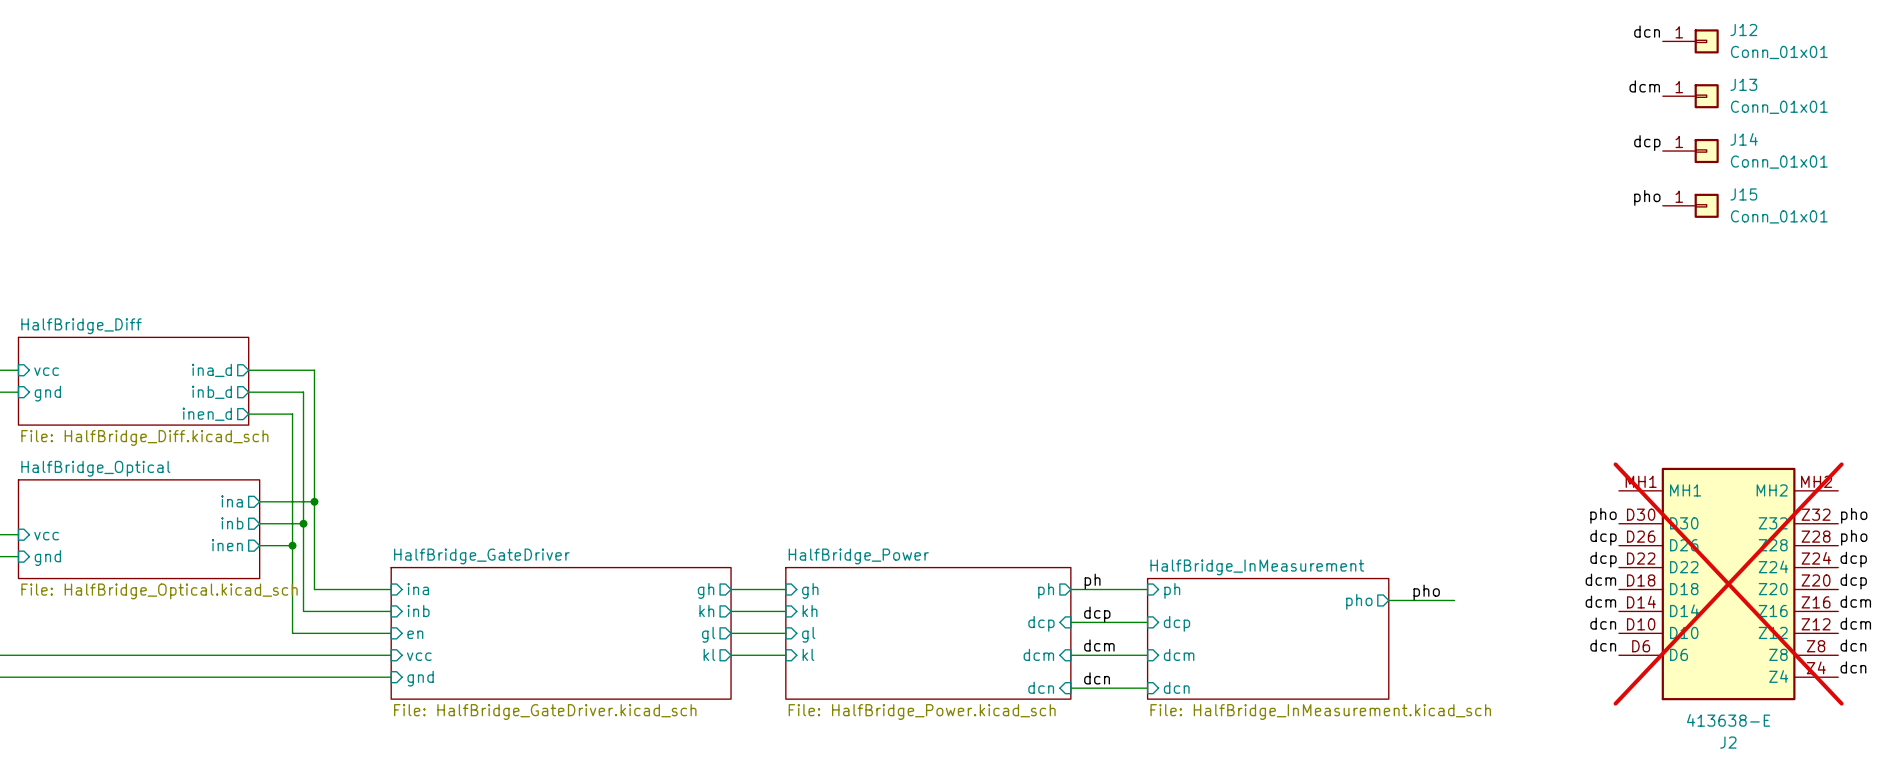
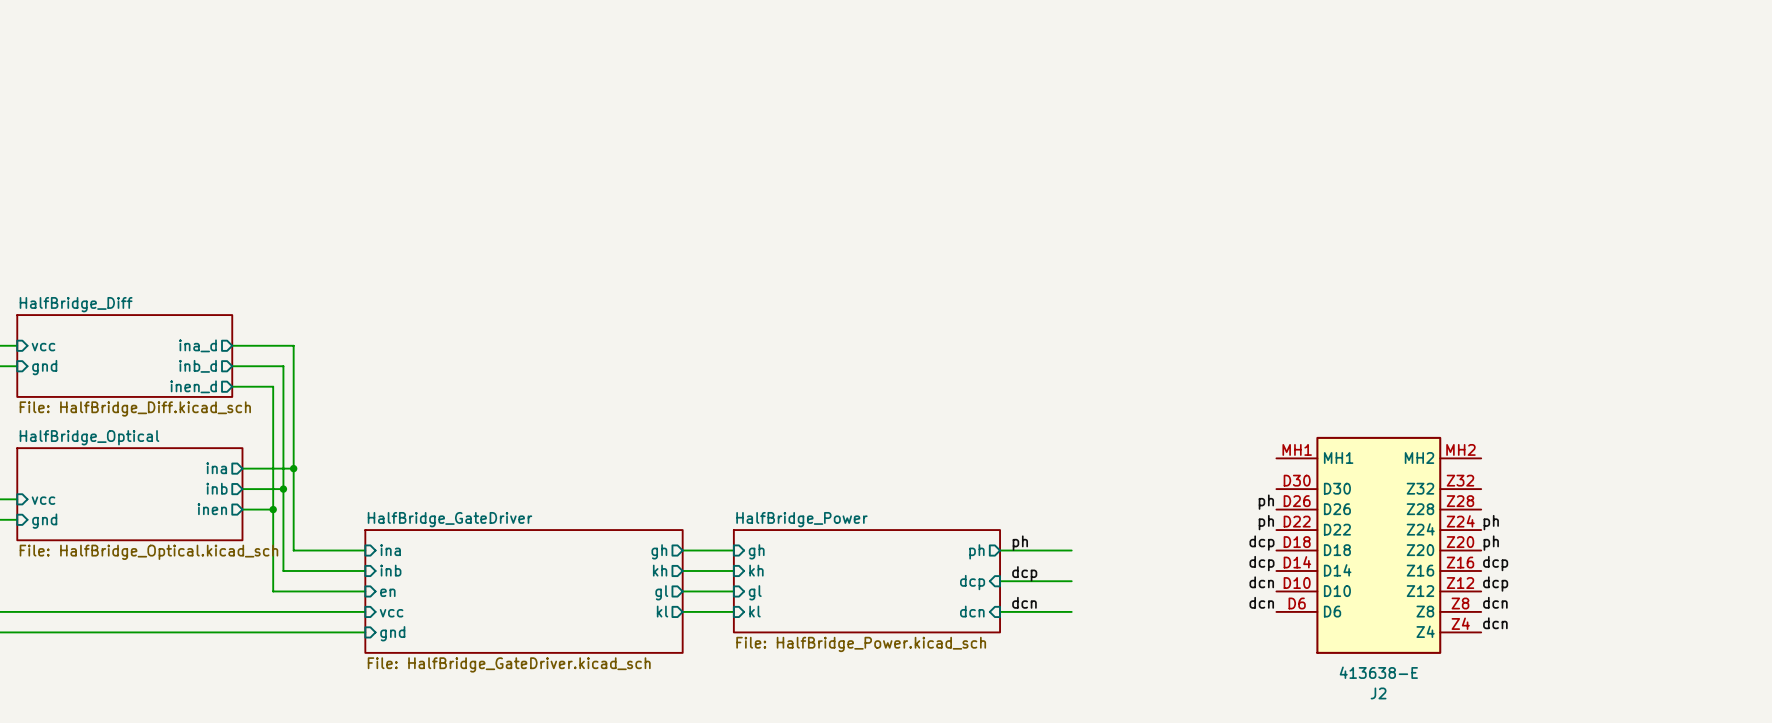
label: dcn (1647, 31) -> none
J12: Conn_01x01 (1690, 41) -> none
label: dcm (1644, 86) -> none
J13: Conn_01x01 (1690, 96) -> none
label: dcp (1647, 143) -> none
J14: Conn_01x01 (1690, 151) -> none
label: pho (1647, 197) -> none
J15: Conn_01x01 (1690, 205) -> none
label: pho (1603, 515) -> none
label: pho (1854, 515) -> none
label: none -> ph (1266, 502)
label: dcp (1603, 537) -> none
label: pho (1854, 537) -> none
label: none -> ph (1266, 522)
label: none -> ph (1491, 522)
label: dcp (1603, 559) -> none
label: dcp (1853, 559) -> none
label: dcm (1600, 579) -> none
label: none -> dcp (1261, 543)
label: none -> ph (1491, 543)
label: dcp (1853, 581) -> none
J2 position: (1728, 584) -> (1378, 545)
J2 do-not-place cross: (1728, 584) -> none
sheet pin: ph (1172, 590) -> none
label: pho (1426, 592) -> none
sheet pin: pho (1359, 601) -> none
label: dcm (1600, 601) -> none
label: dcm (1855, 601) -> none
label: none -> dcp (1261, 563)
label: none -> dcp (1495, 563)
sheet HalfBridge_Power: none -> File: HalfBridge_Power.kicad_sch (866, 581)
sheet pin: dcp (1177, 623) -> none
label: none -> dcn (1261, 582)
label: dcn (1603, 623) -> none
label: dcm (1855, 623) -> none
label: none -> dcp (1495, 584)
sheet HalfBridge_Power: File: HalfBridge_Power.kicad_sch (928, 633) -> none
sheet HalfBridge_InMeasurement: File: HalfBridge_InMeasurement.kicad_sch (1268, 638) -> none
label: dcm (1099, 645) -> dcn (1024, 602)
label: none -> dcn (1261, 602)
label: none -> dcn (1495, 602)
label: dcn (1603, 645) -> none
label: dcn (1853, 645) -> none
sheet pin: dcm (1038, 654) -> dcn (972, 611)
sheet pin: dcm (1179, 654) -> none
label: none -> dcn (1495, 623)
label: dcn (1853, 667) -> none
label: dcn (1097, 678) -> none
sheet pin: dcn (1041, 687) -> none
sheet pin: dcn (1176, 687) -> none
wire: (1070, 688) (1147, 688) -> none

